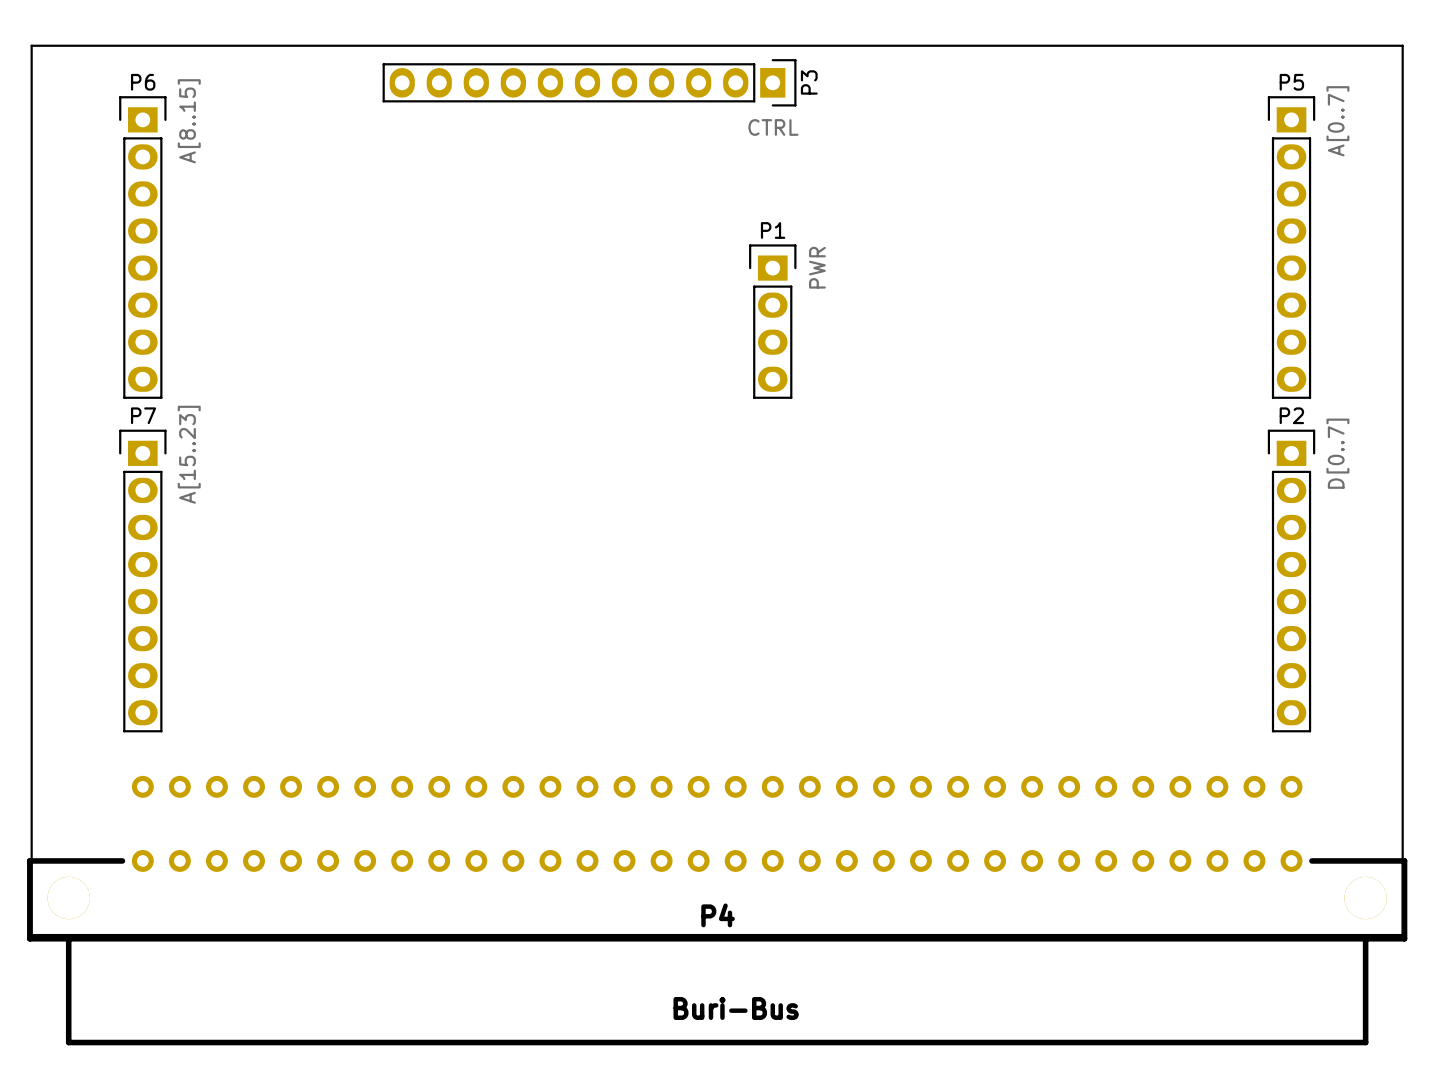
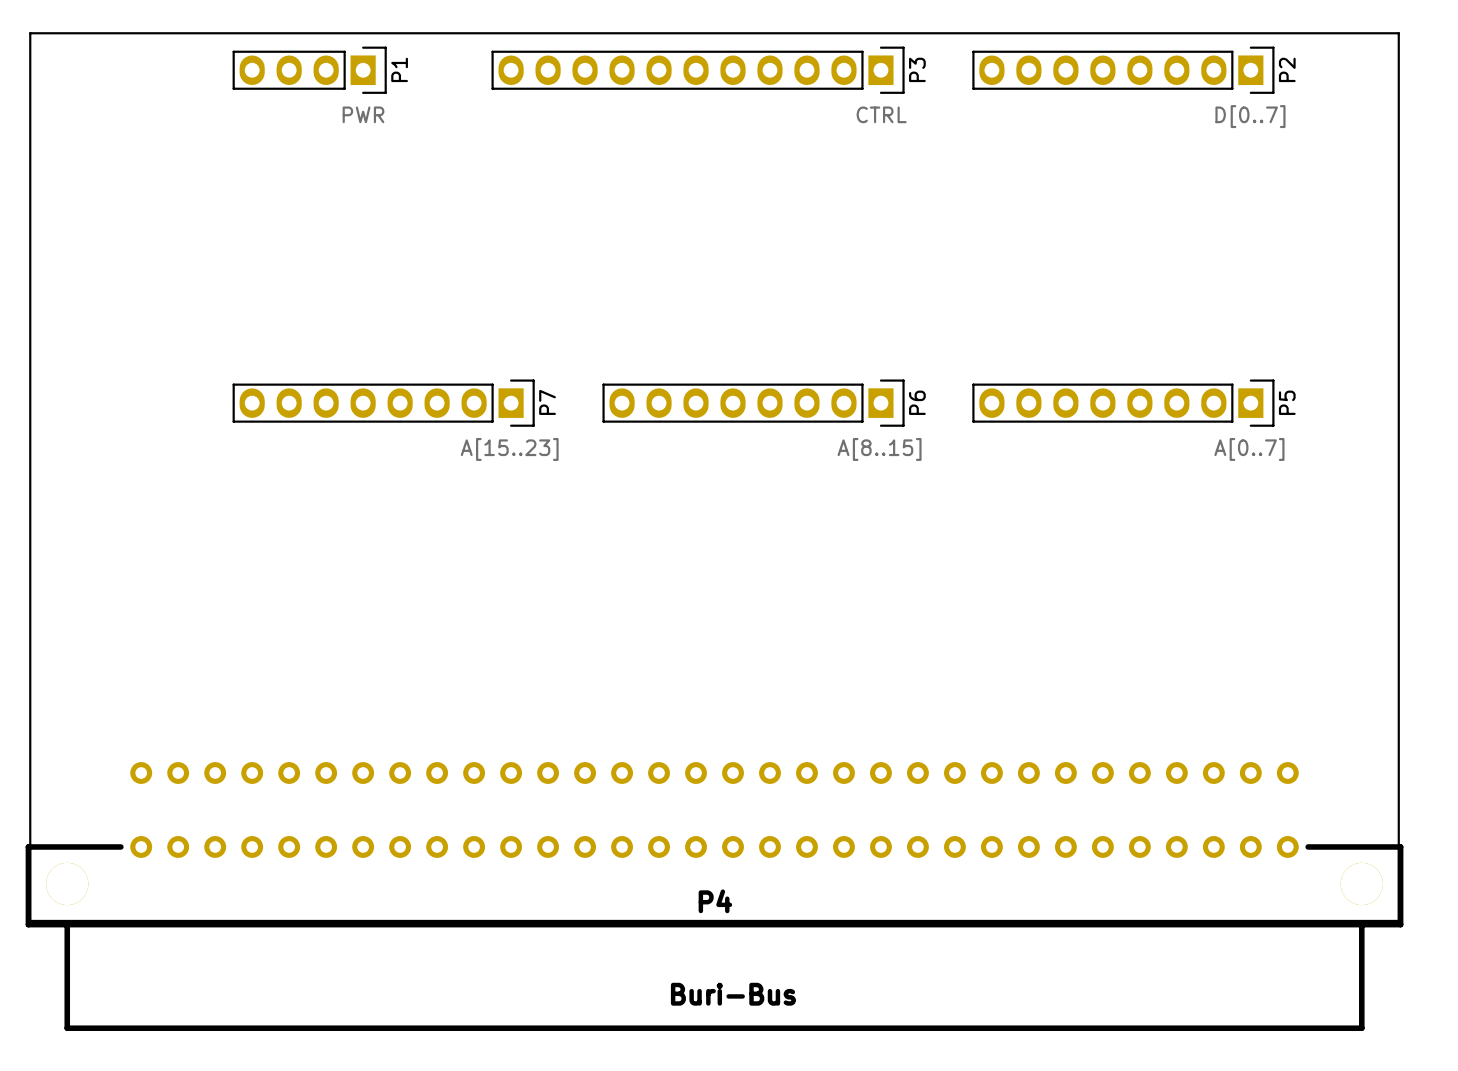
P3 position: (589, 82) -> (698, 70)
P6 rotation: 0° (142, 247) -> 90° clockwise (753, 403)
P6 position: (142, 247) -> (753, 403)
P5 rotation: 0° (1291, 247) -> 90° clockwise (1123, 403)
P5 position: (1291, 247) -> (1123, 403)
P1 rotation: 0° (772, 321) -> 90° clockwise (309, 70)
P1 position: (772, 321) -> (309, 70)
P7 rotation: 0° (142, 581) -> 90° clockwise (383, 403)
P7 position: (142, 581) -> (383, 403)
P2 rotation: 0° (1291, 581) -> 90° clockwise (1123, 70)
P2 position: (1291, 581) -> (1123, 70)

